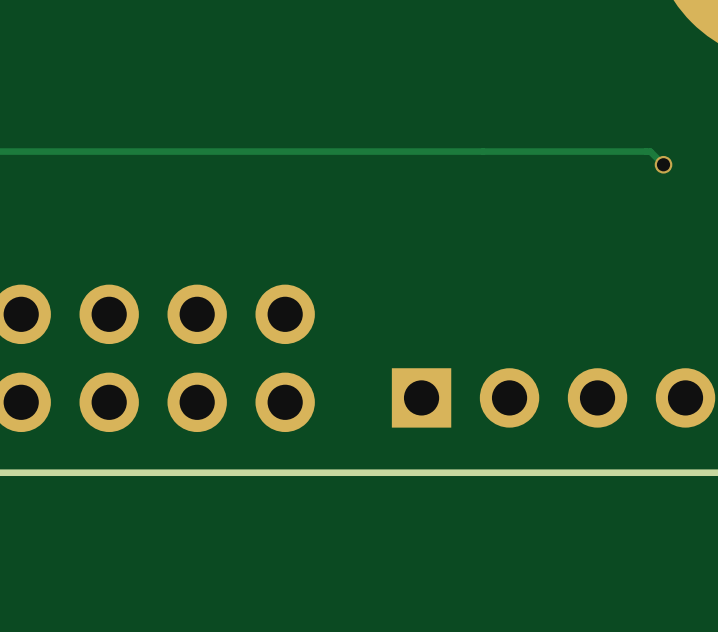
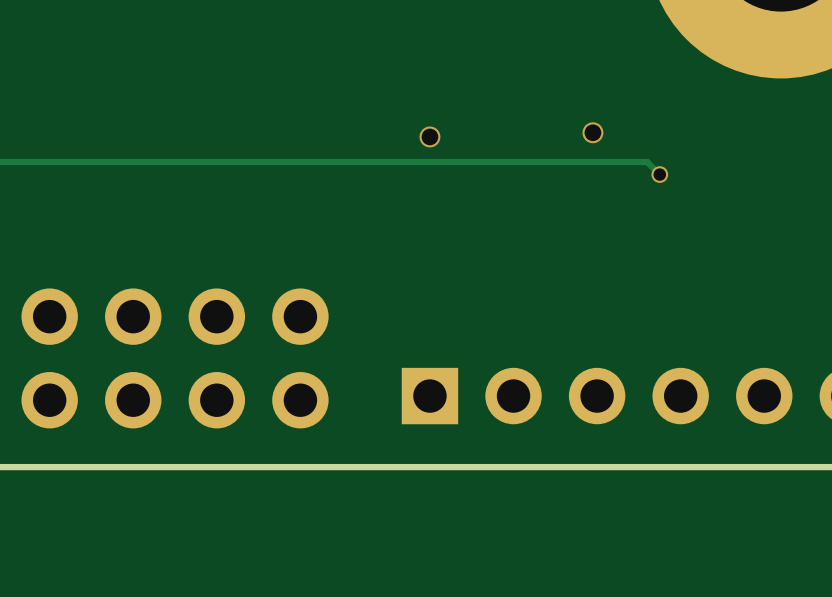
via: none -> (592, 132)
via: none -> (429, 136)

